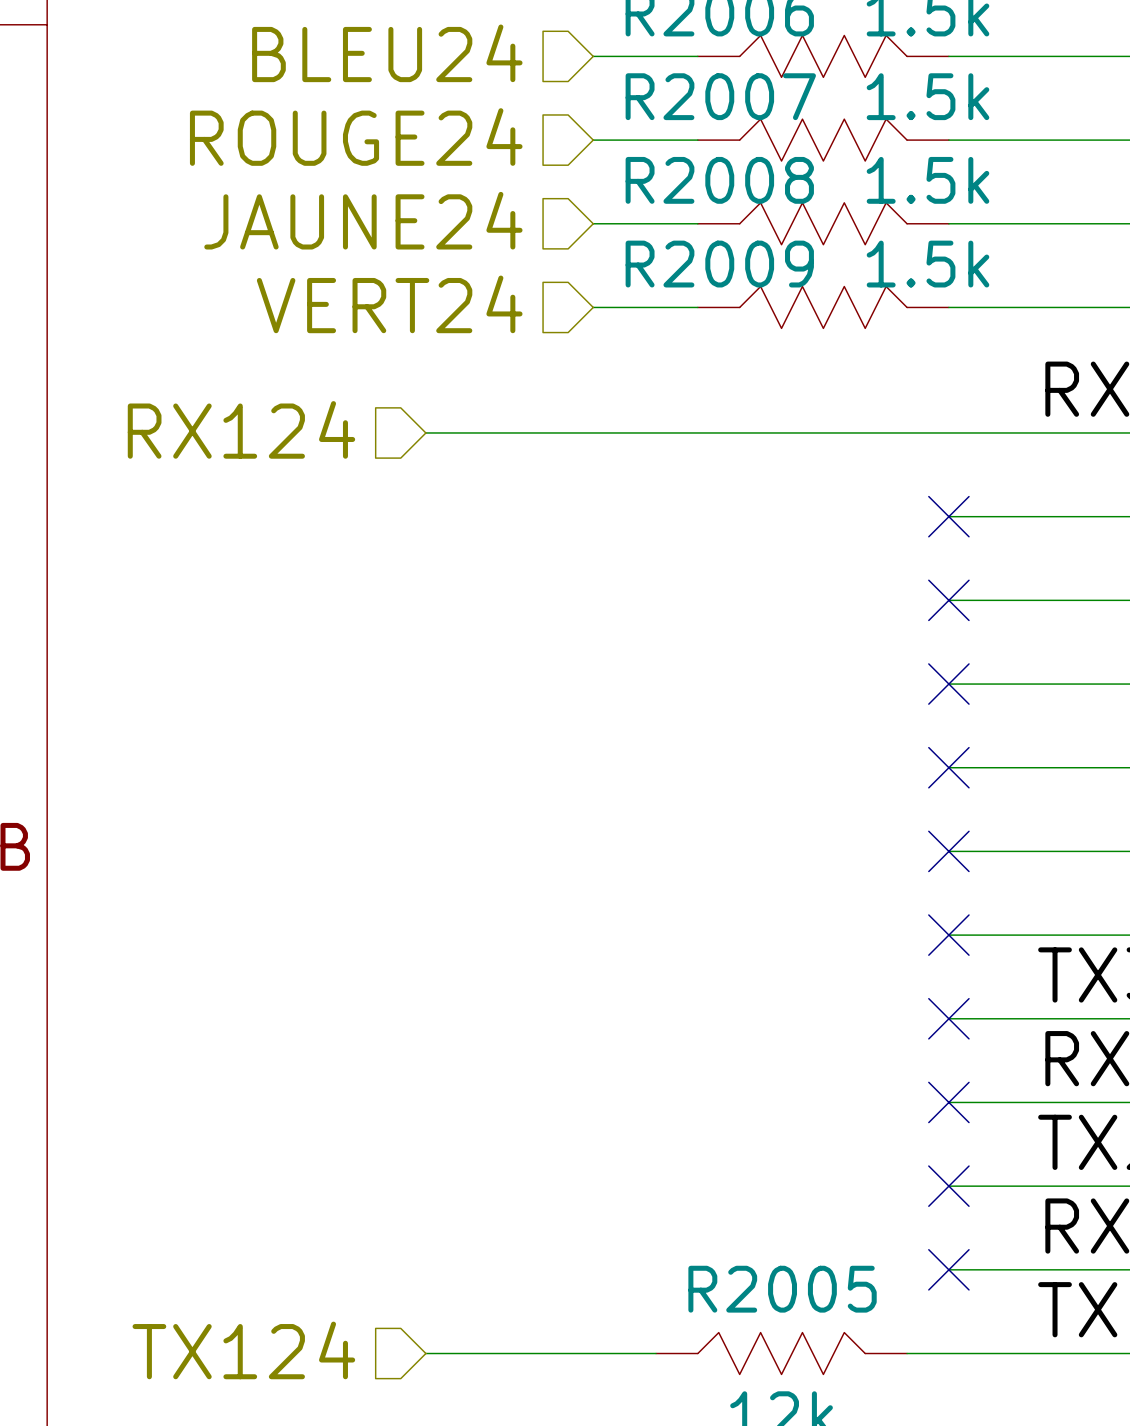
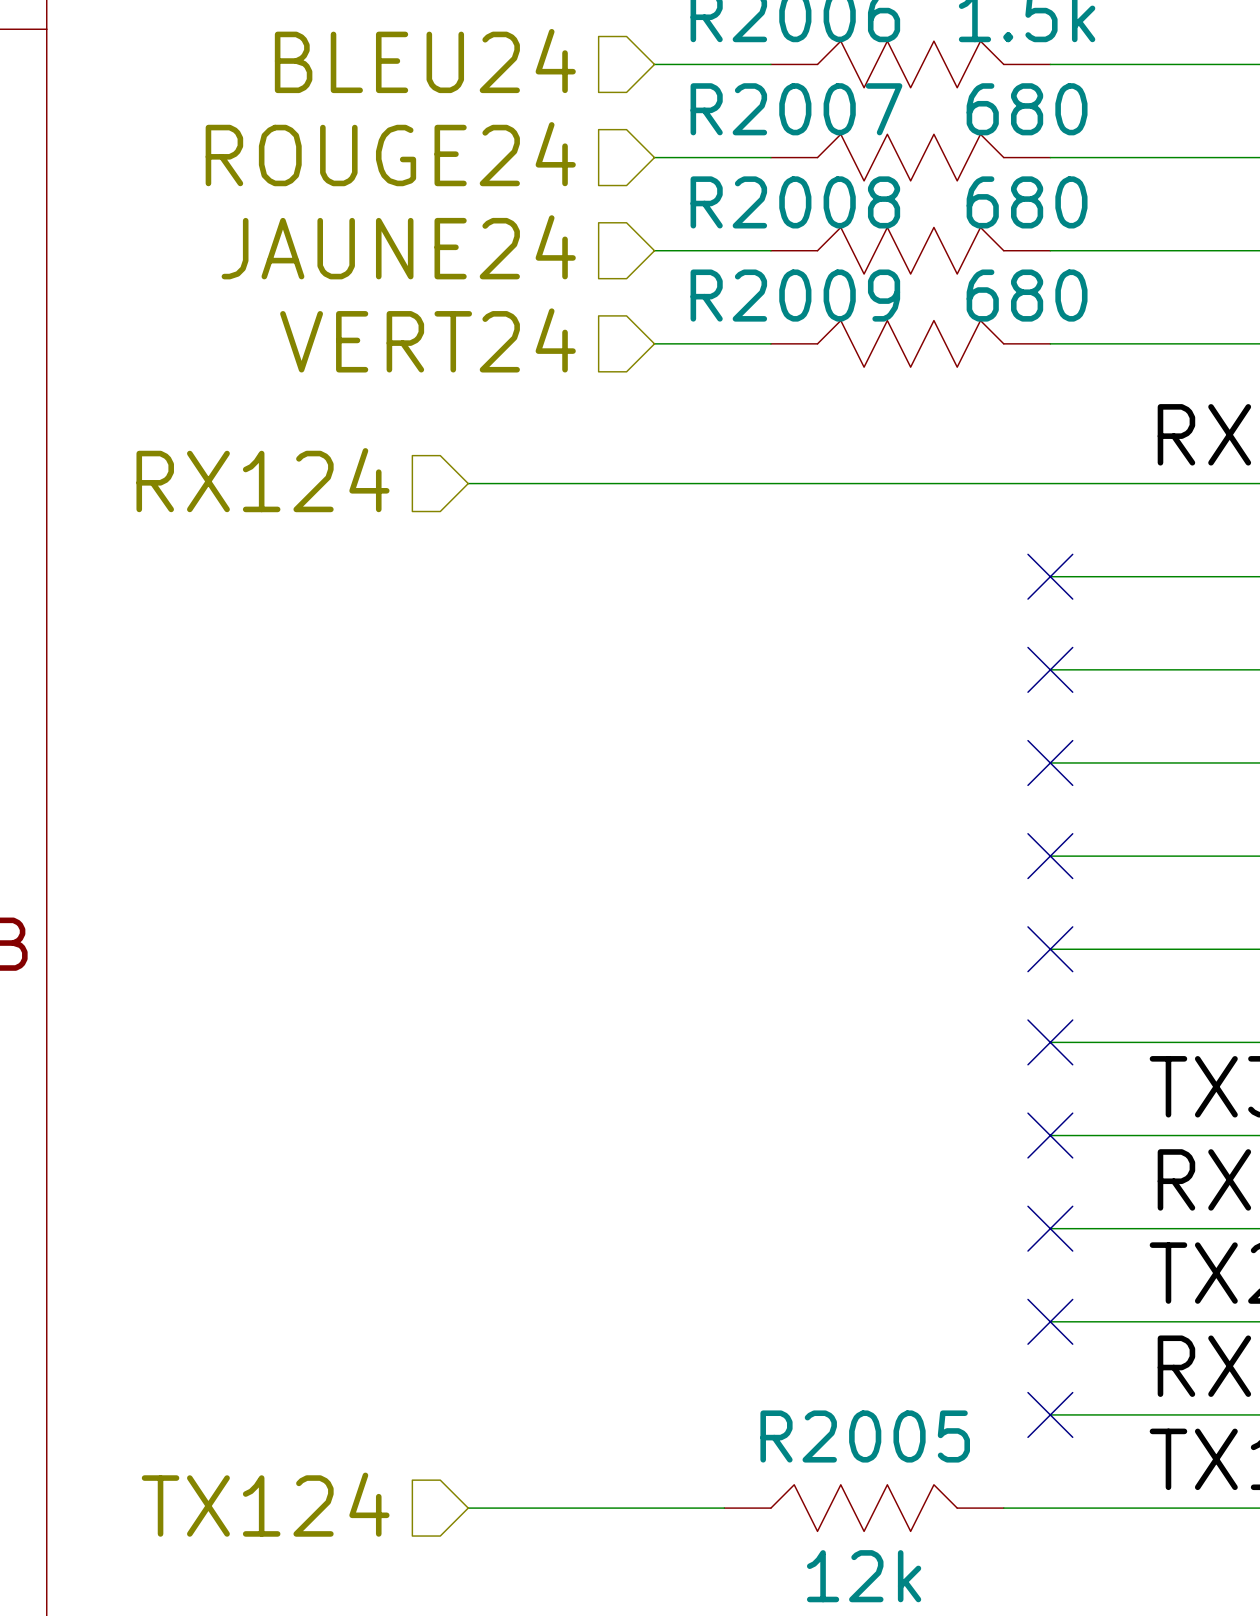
R2007 value: 1.5k (927, 96) -> 680 (1027, 109)
R2008 value: 1.5k (927, 180) -> 680 (1027, 202)
R2009 value: 1.5k (927, 264) -> 680 (1027, 295)

